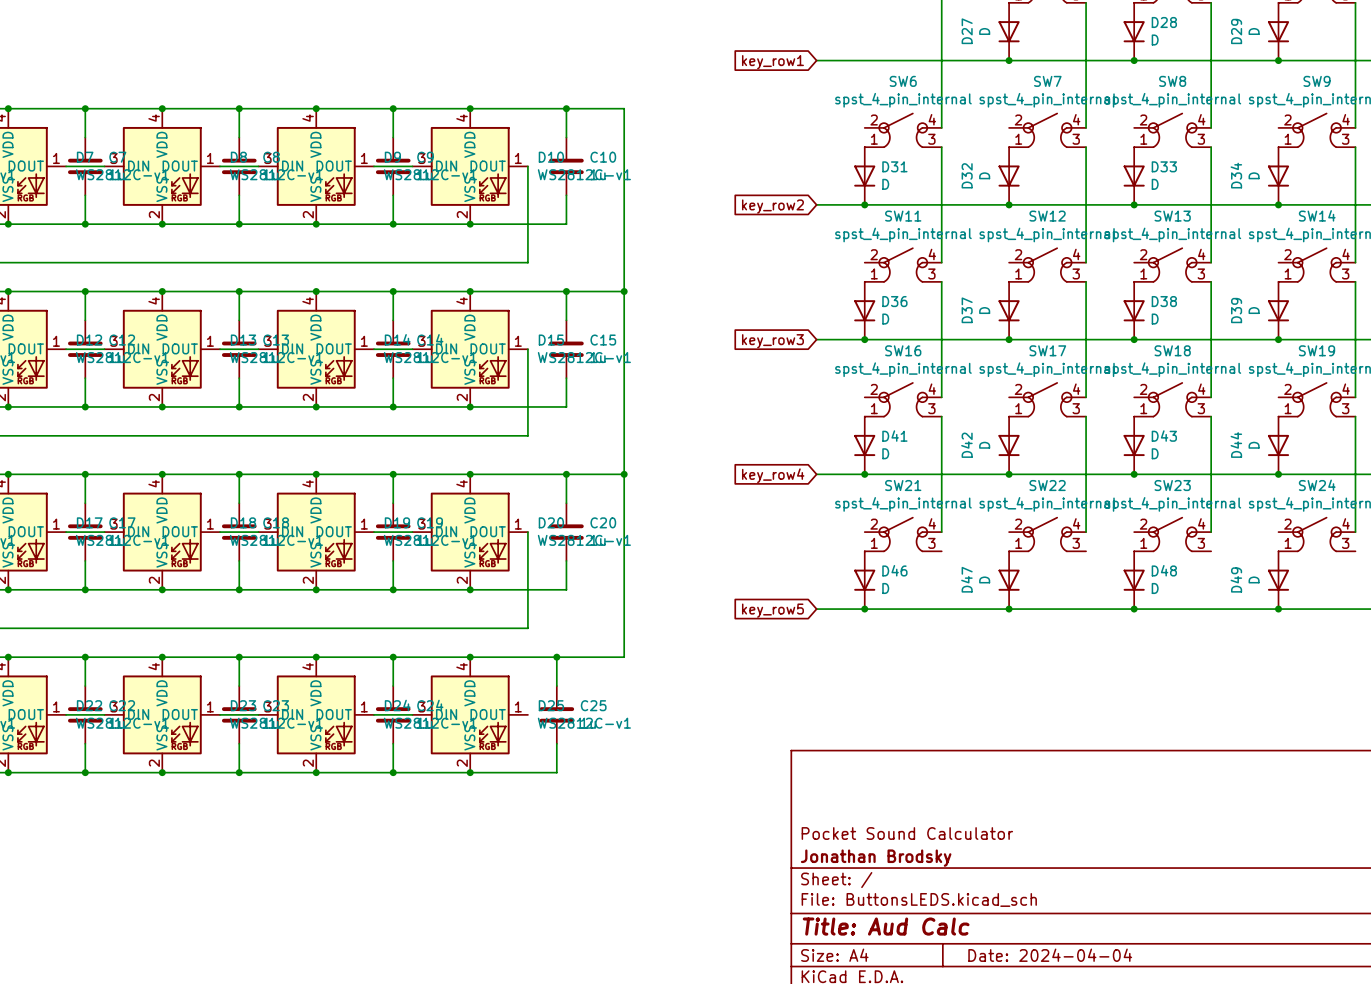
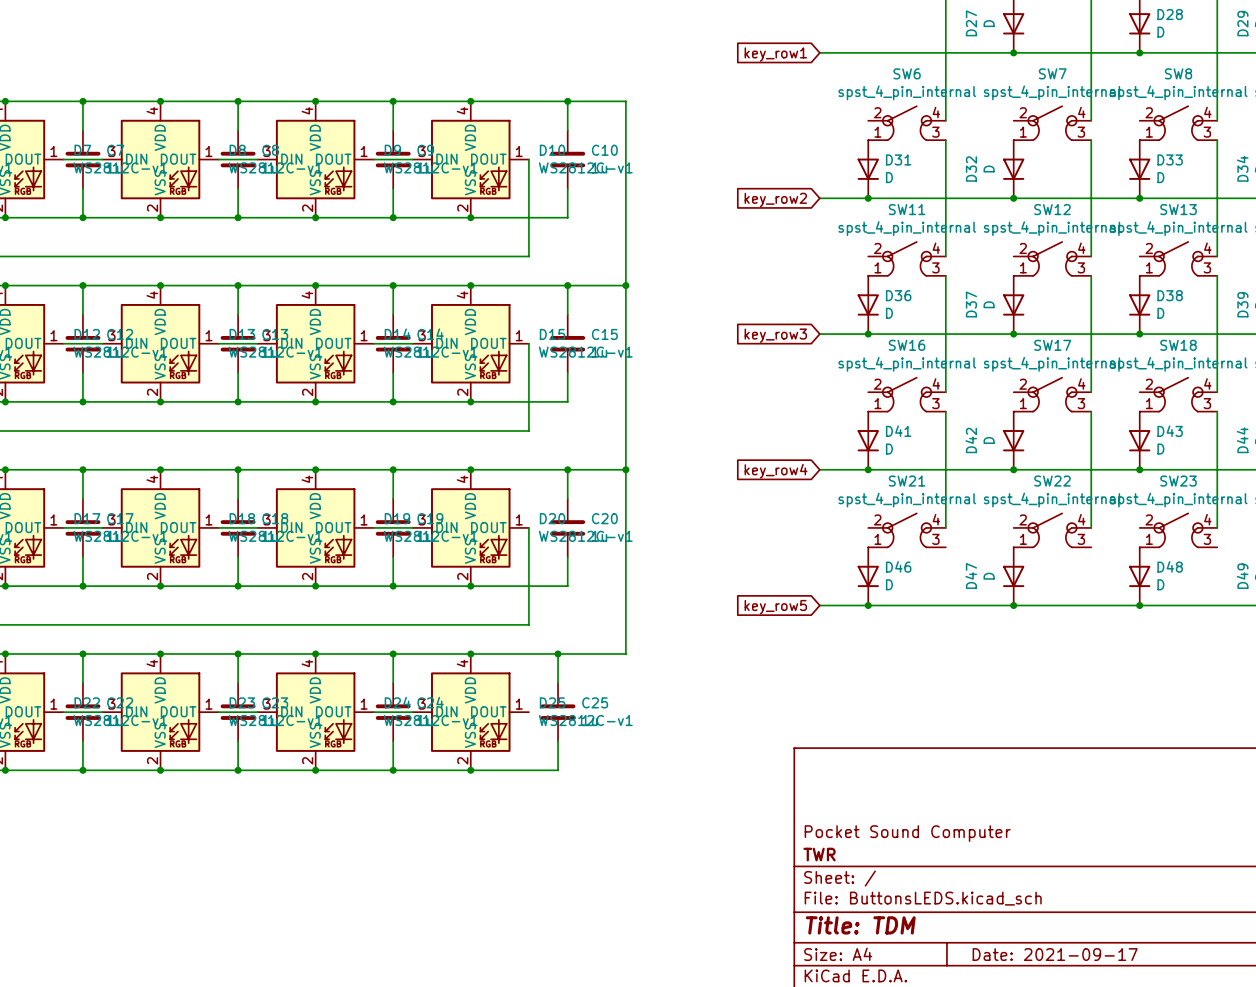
title block: Pocket Sound Calculator (907, 833) -> Pocket Sound Computer (907, 833)
title block: Jonathan Brodsky (876, 858) -> TWR (819, 854)
title block: Title: Aud Calc (886, 926) -> Title: TDM (860, 925)
title block: Date: 2024-04-04 (1050, 955) -> Date: 2021-09-17 (1055, 954)

